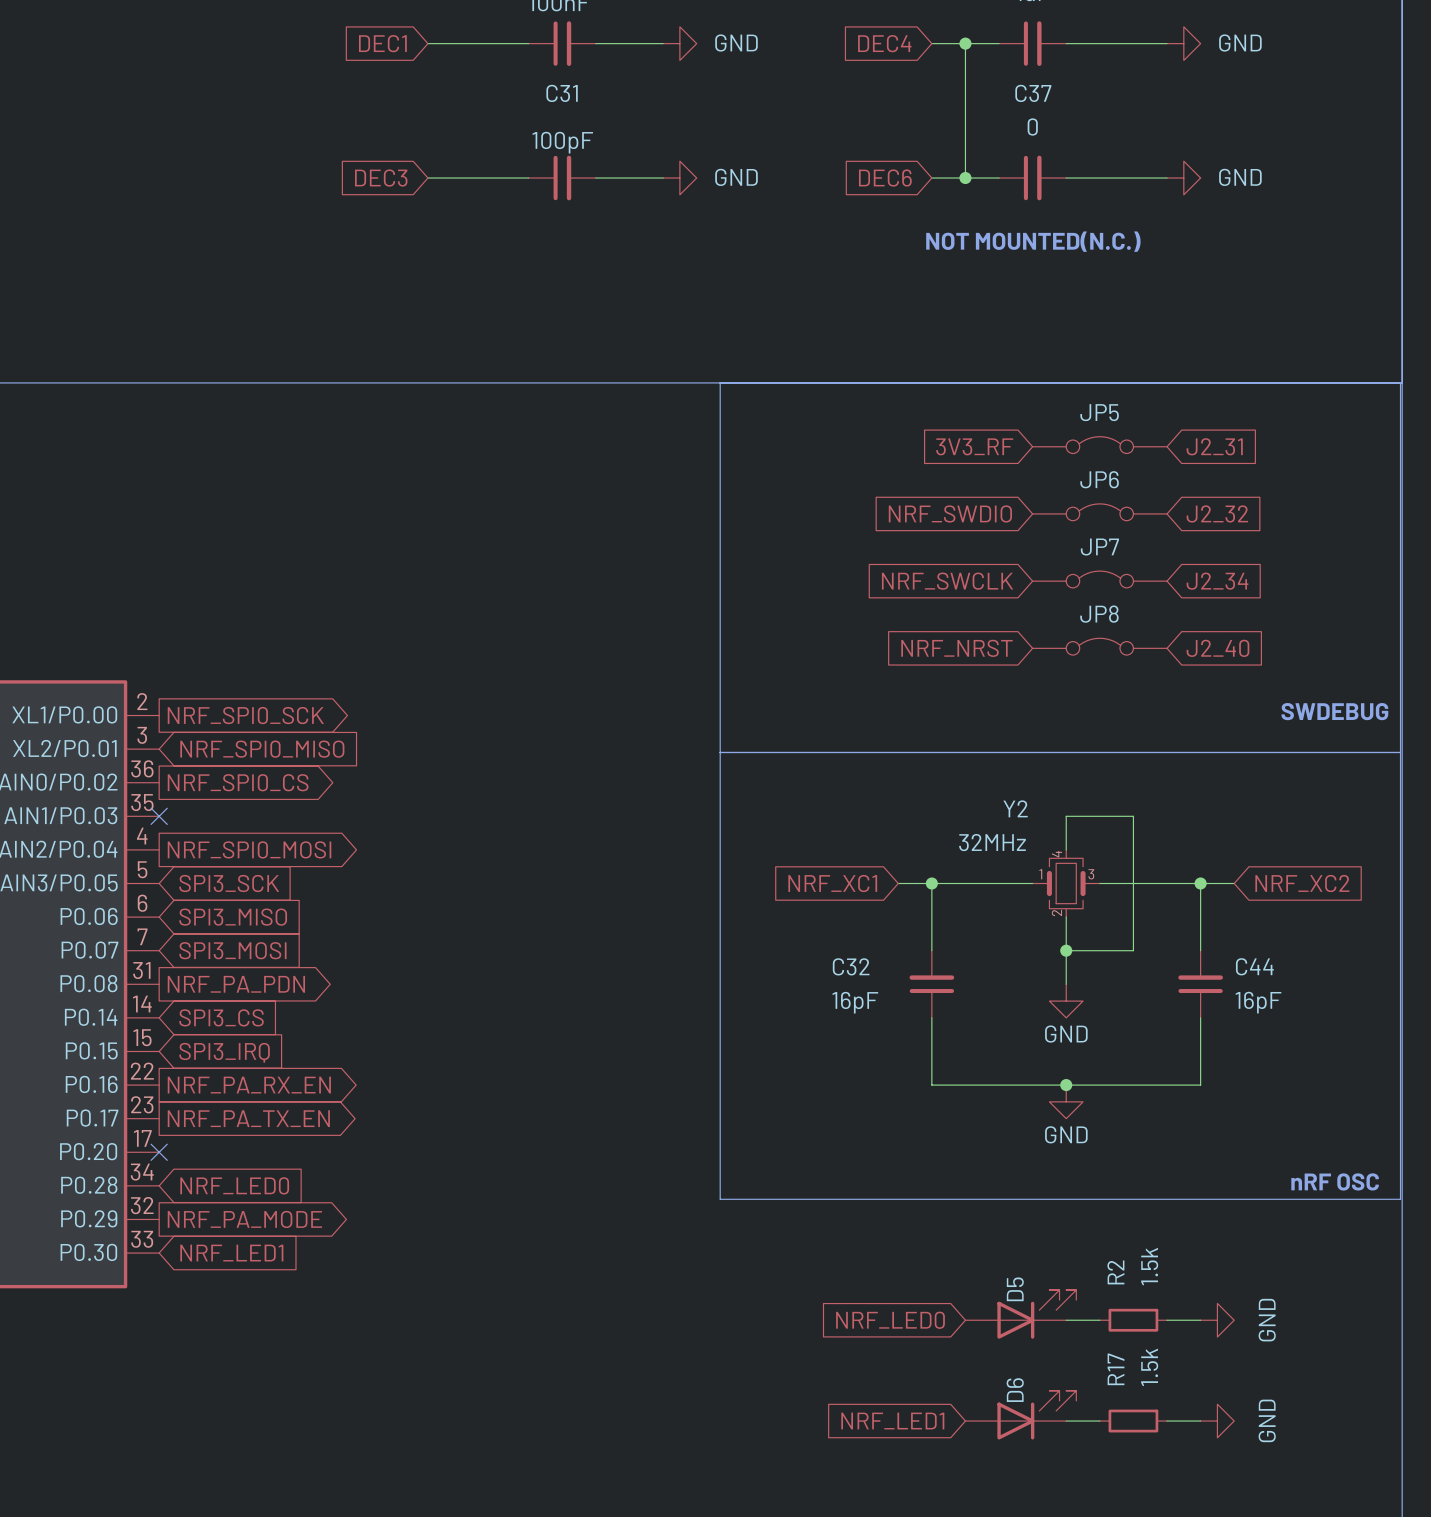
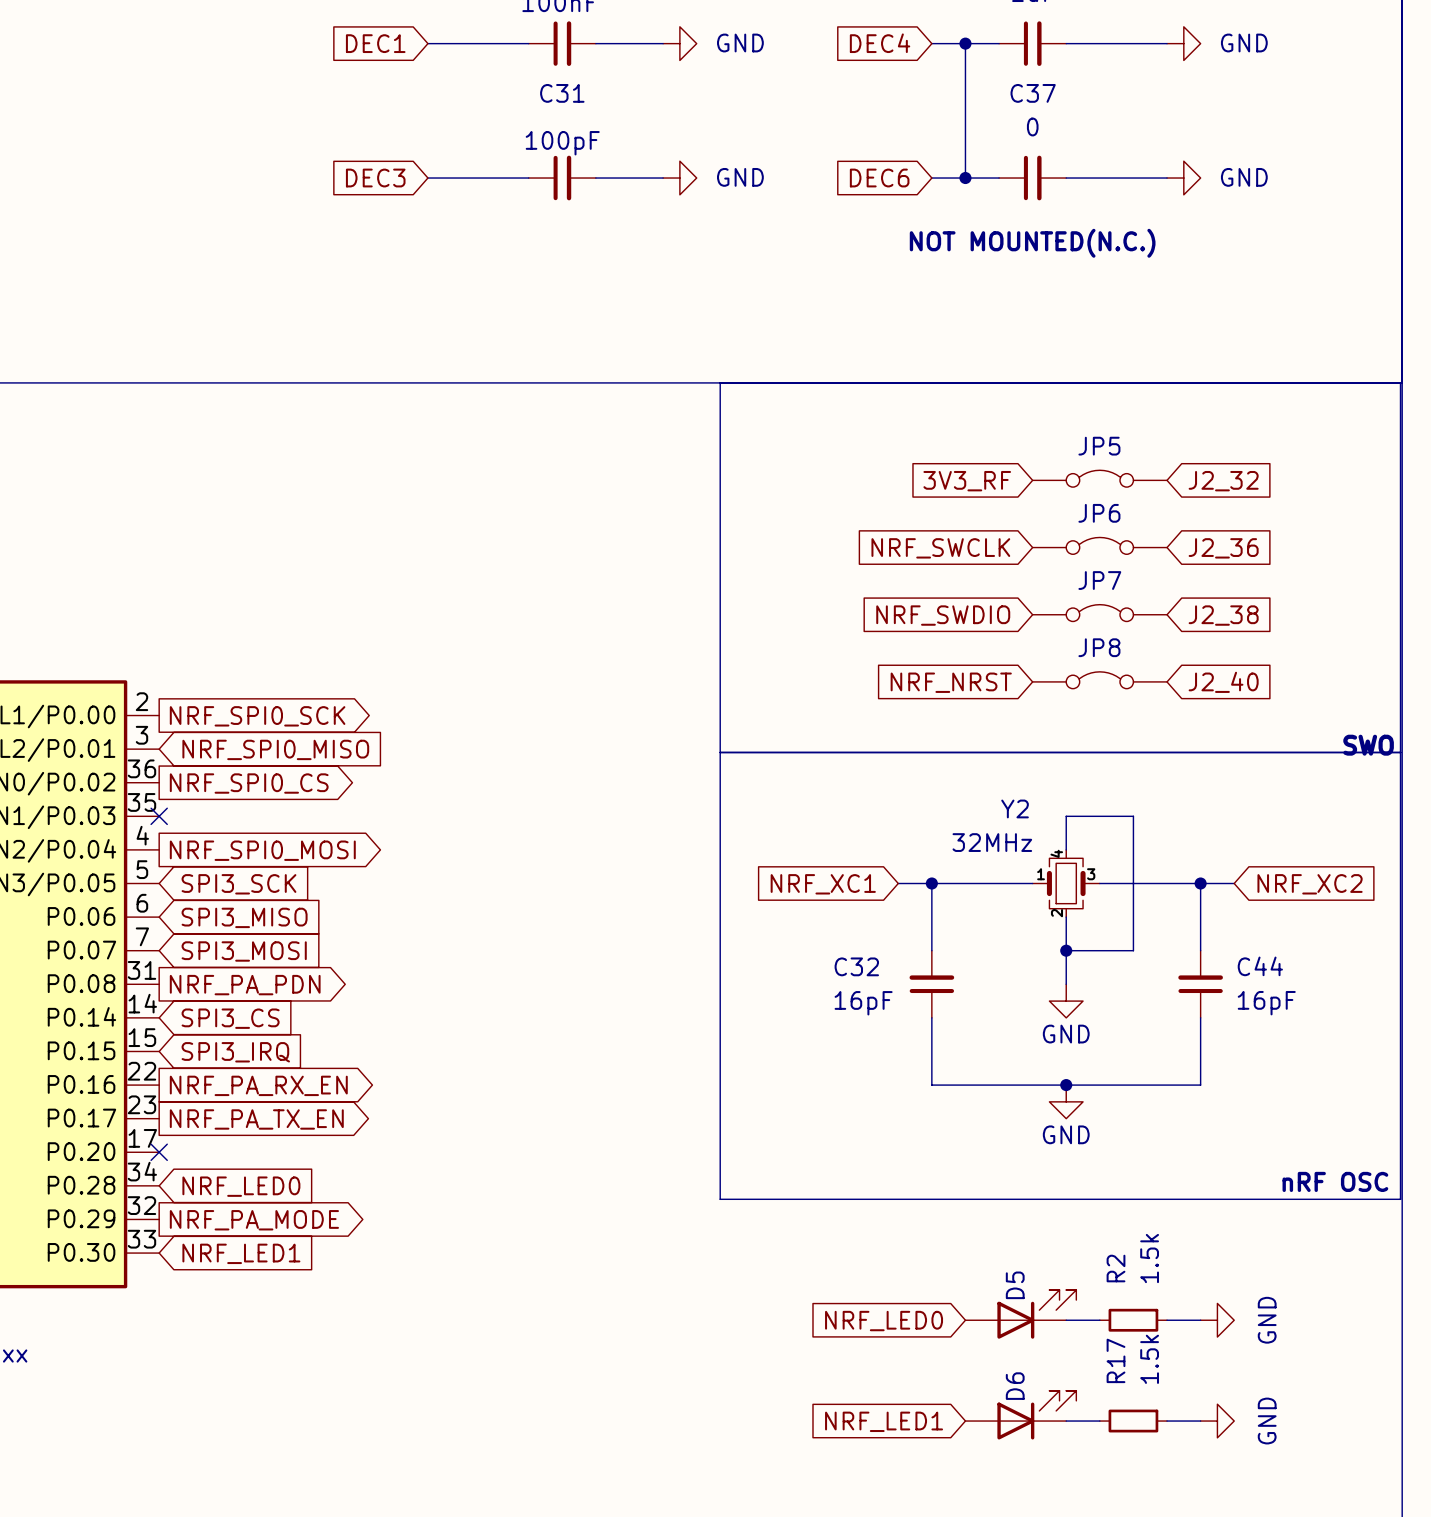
JP5 position: (1099, 445) -> (1099, 478)
global label position: 3V3_RF (974, 446) -> 3V3_RF (967, 481)
global label: J2_31 (1214, 446) -> none
JP6 position: (1099, 512) -> (1099, 545)
global label position: NRF_SWDIO (950, 513) -> NRF_SWDIO (943, 615)
global label position: J2_32 (1217, 513) -> J2_32 (1223, 481)
global label: none -> J2_36 (1223, 548)
JP7 position: (1099, 579) -> (1099, 613)
global label position: NRF_SWCLK (947, 581) -> NRF_SWCLK (940, 548)
global label: J2_34 (1217, 581) -> none
global label: none -> J2_38 (1223, 615)
JP8 position: (1099, 646) -> (1099, 680)
global label position: NRF_NRST (956, 648) -> NRF_NRST (951, 682)
global label position: J2_40 (1217, 648) -> J2_40 (1223, 682)
text: SWDEBUG (1334, 711) -> none
text: none -> SWO (1368, 745)

